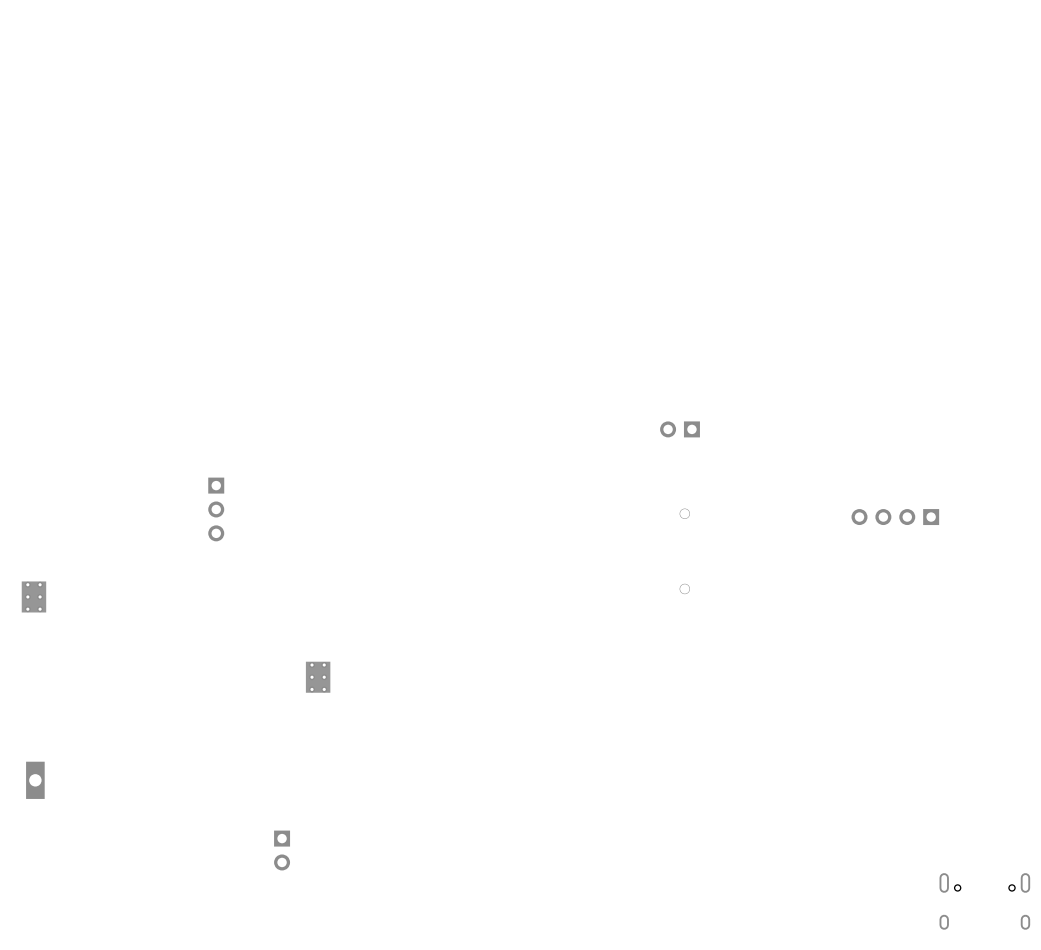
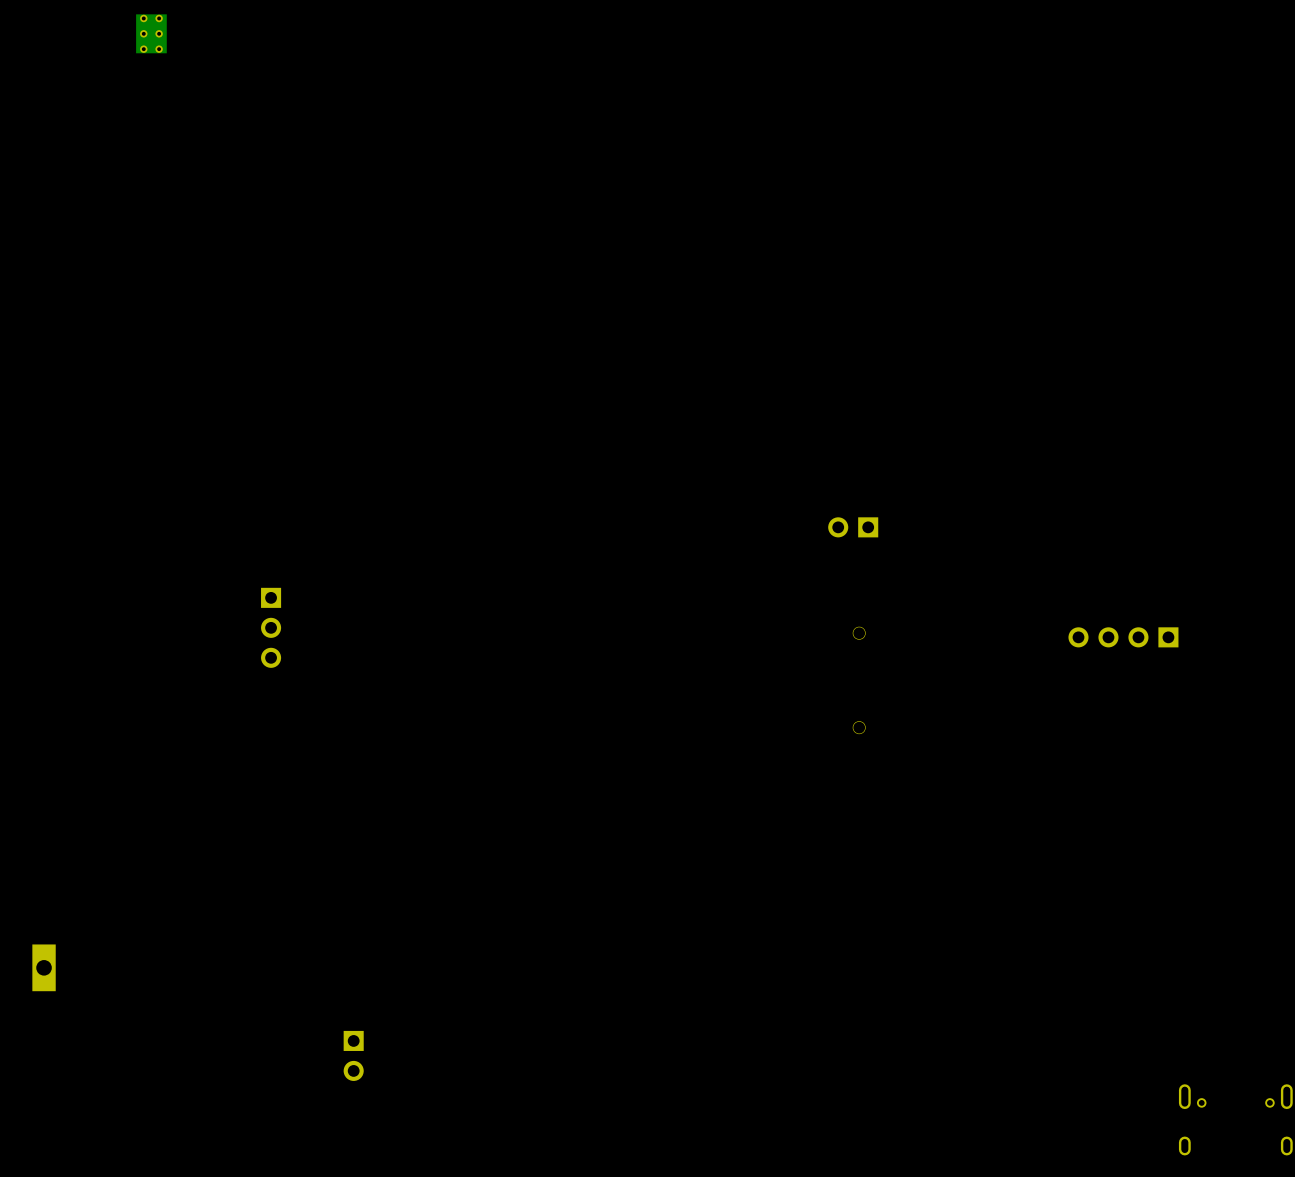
part: none -> (151, 33)
part: (33, 596) -> none
part: (318, 677) -> none

